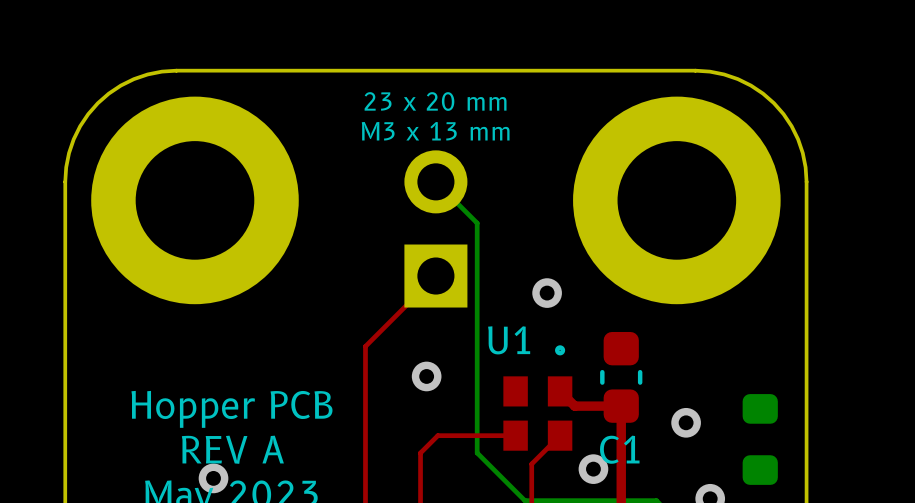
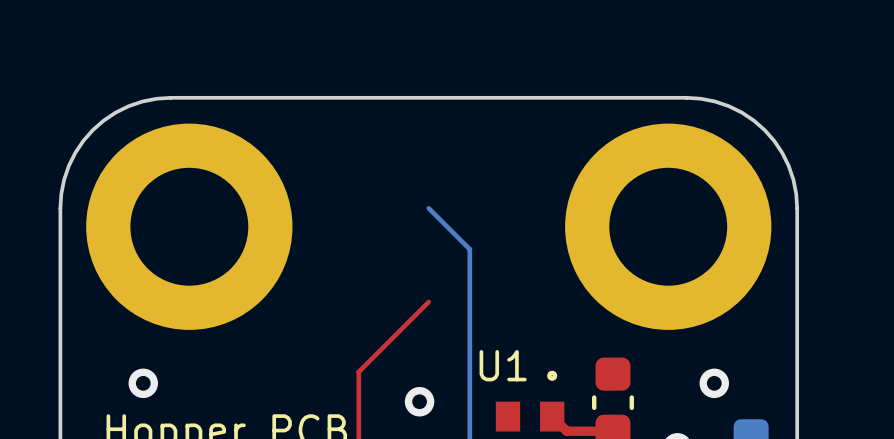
text: 23 x 20 mm (435, 101) -> none
text: M3 x 13 mm (435, 131) -> none
part: (435, 228) -> none
via: (547, 293) -> none
via: none -> (143, 383)
via: none -> (714, 383)

